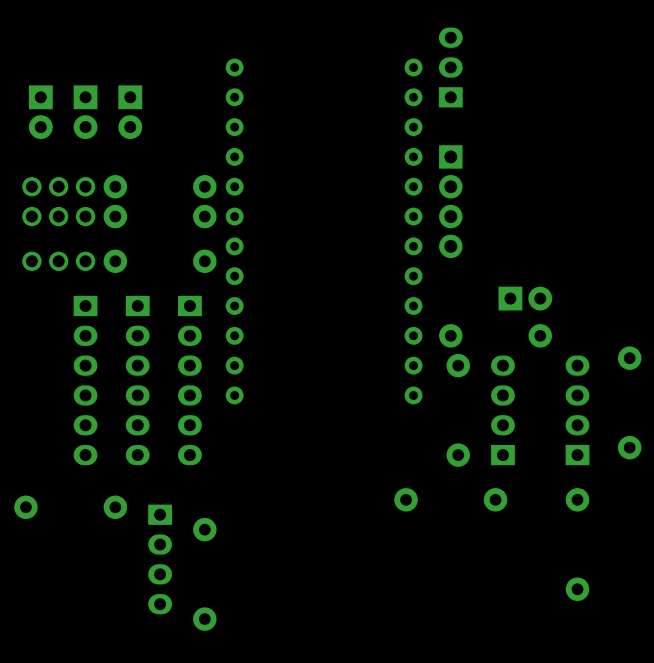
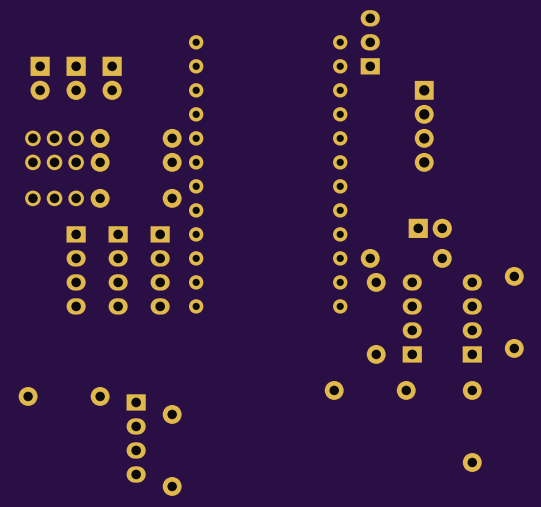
part position: (450, 201) -> (424, 126)
part: (85, 380) -> none
part: (137, 380) -> none
part: (189, 380) -> none

